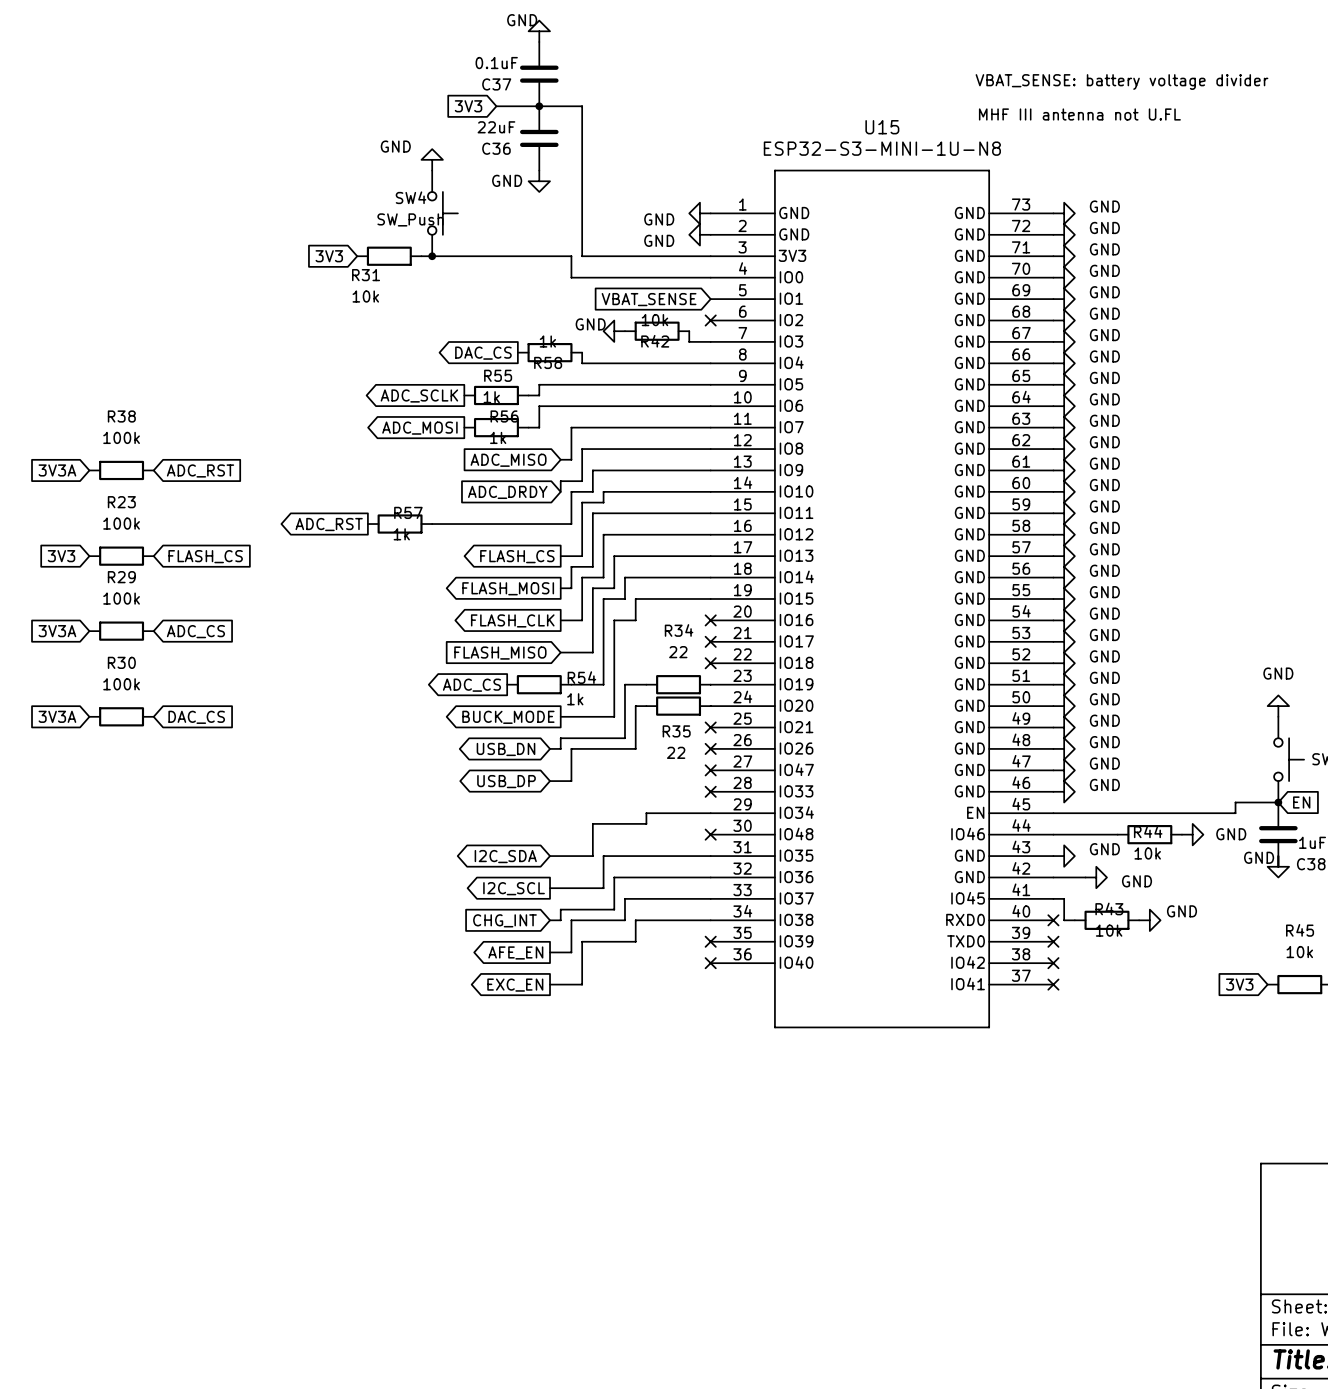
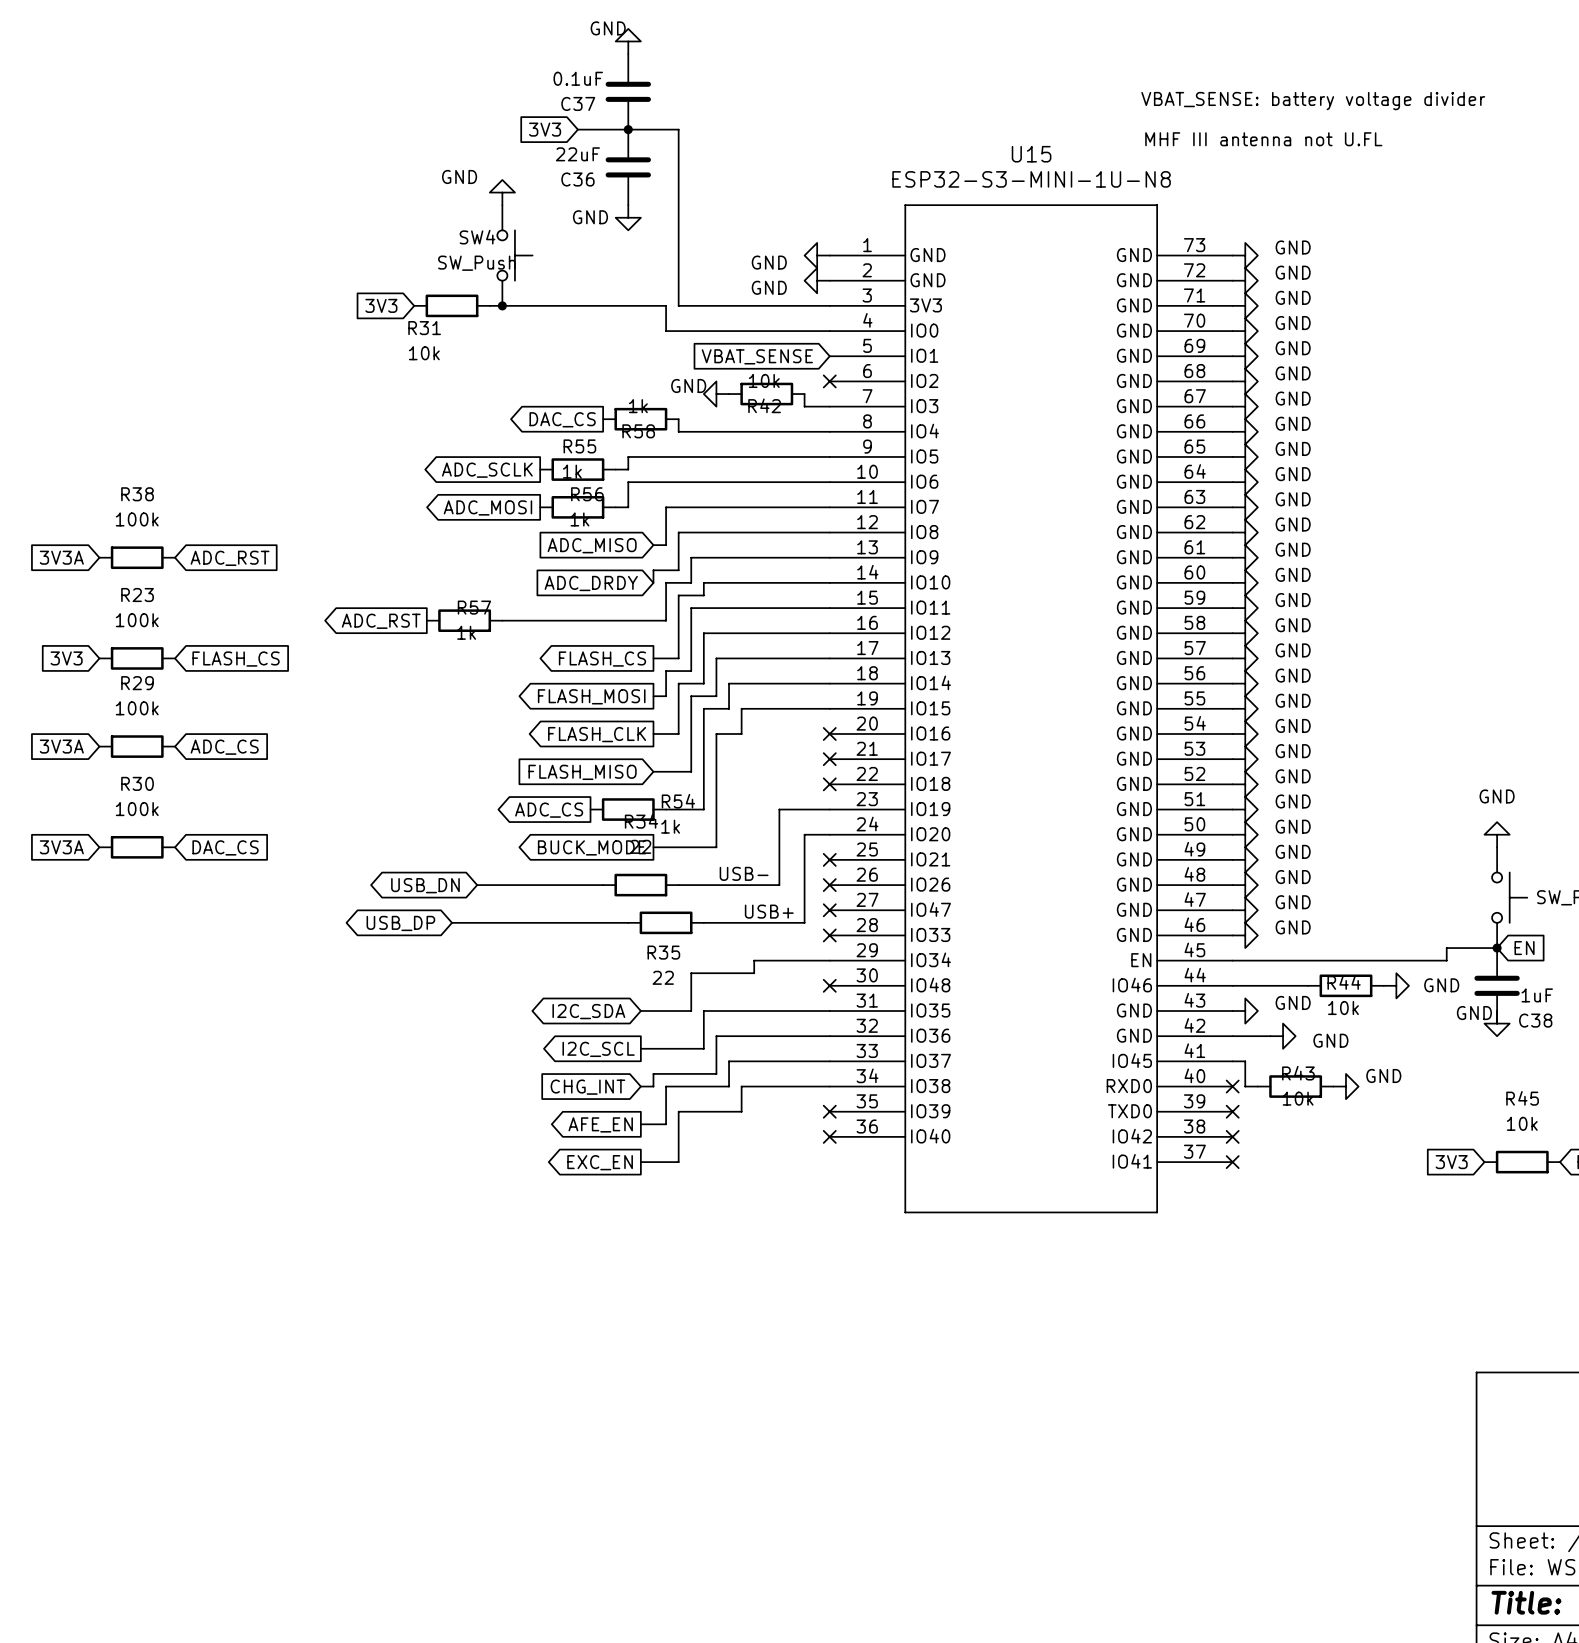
wire: (646, 684) (624, 684) (624, 738) (560, 738) (560, 748) (550, 748) -> none
R34 position: (678, 684) -> (640, 885)
wire: (646, 706) (635, 706) (635, 748) -> (829, 809) (779, 809) (779, 885) (741, 885)
R35 position: (678, 706) -> (666, 922)
wire: none -> (829, 834) (804, 834) (804, 922) (703, 922)
label: none -> USB- (744, 873)
wire: none -> (477, 885) (603, 885)
wire: (582, 748) (571, 748) (571, 781) (550, 781) -> none
global label position: USB_DN (506, 749) -> USB_DN (425, 885)
label: none -> USB+ (769, 911)
wire: none -> (452, 922) (628, 922)
global label position: USB_DP (506, 781) -> USB_DP (400, 923)

